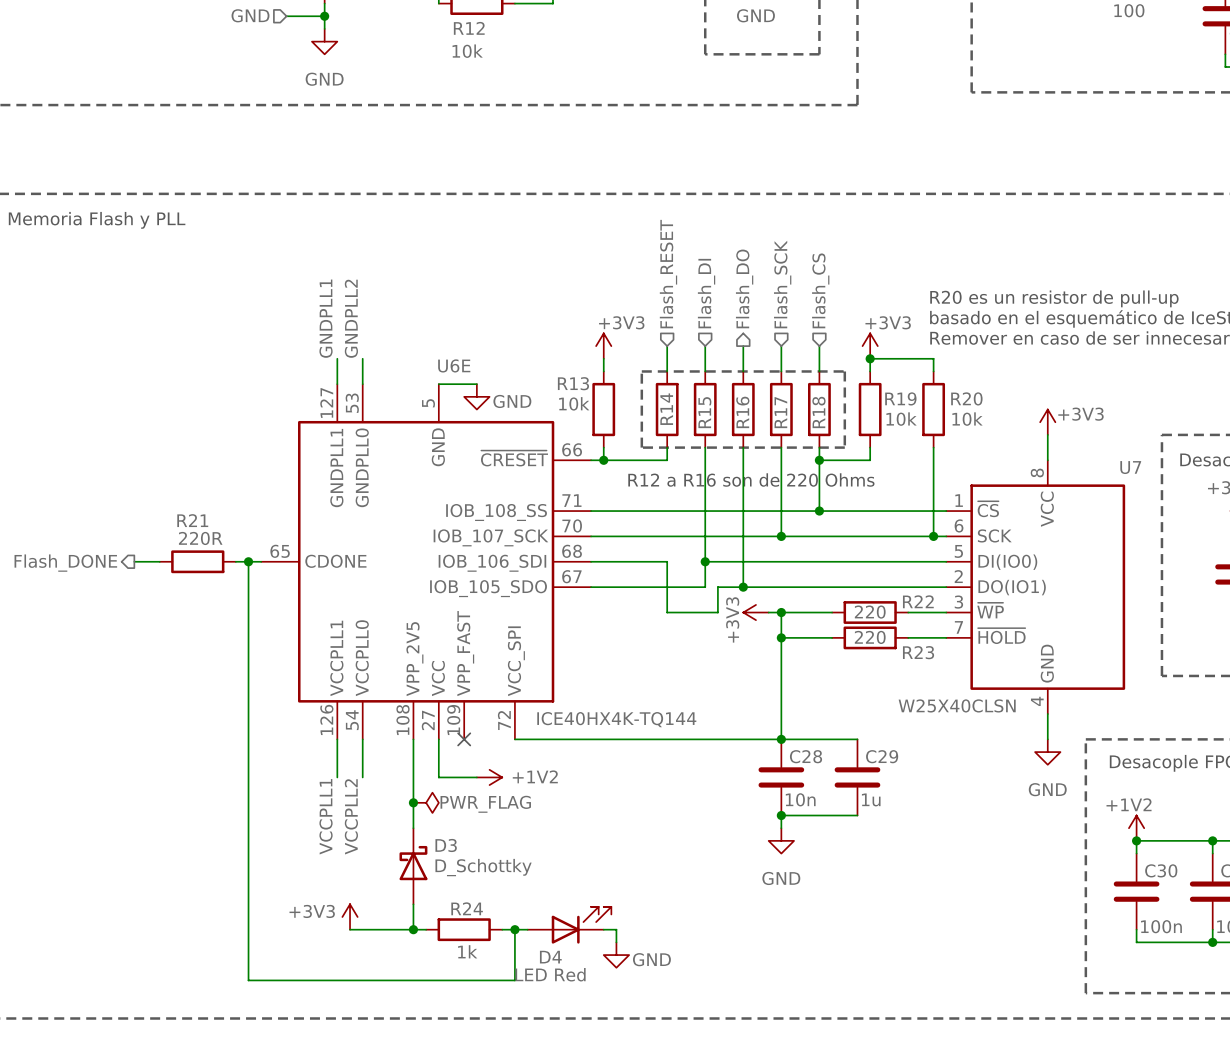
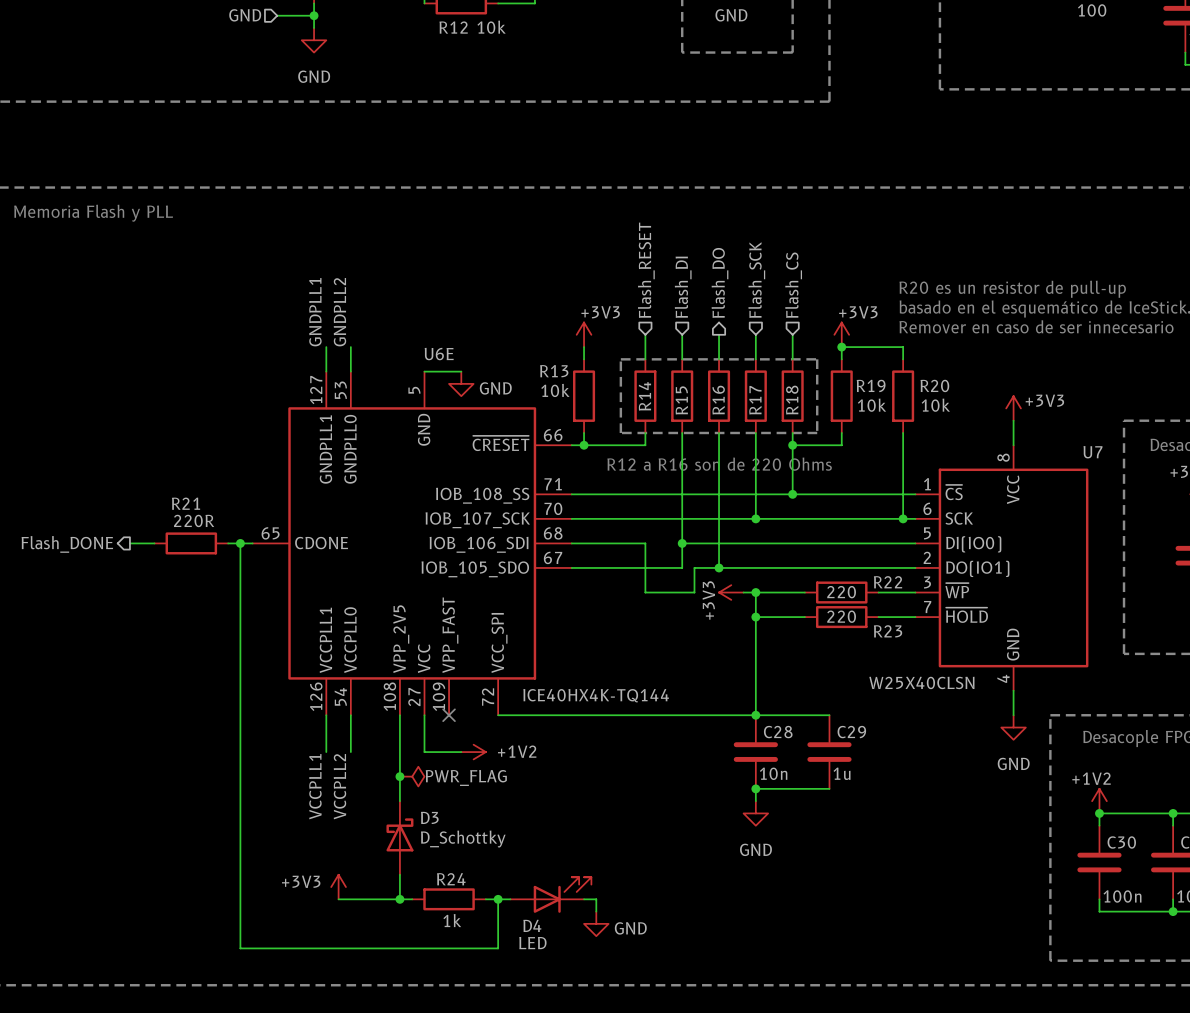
R12 value position: 10k (467, 51) -> 10k (491, 27)
D4 value: LED Red (550, 974) -> LED (532, 943)

